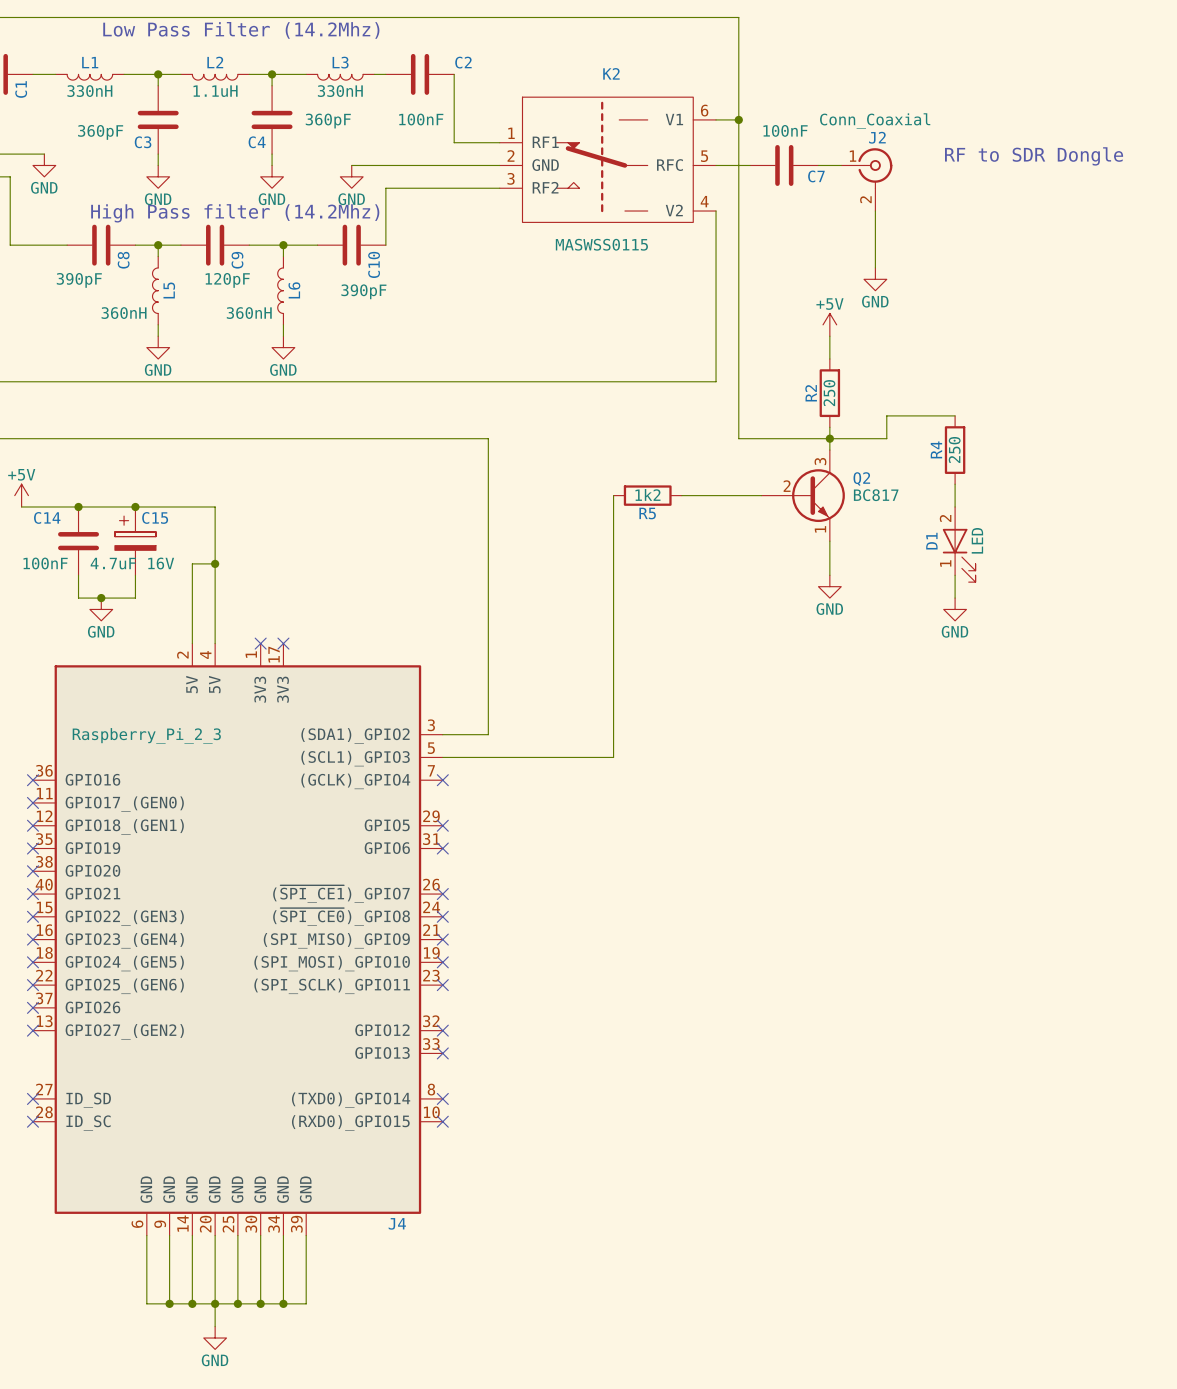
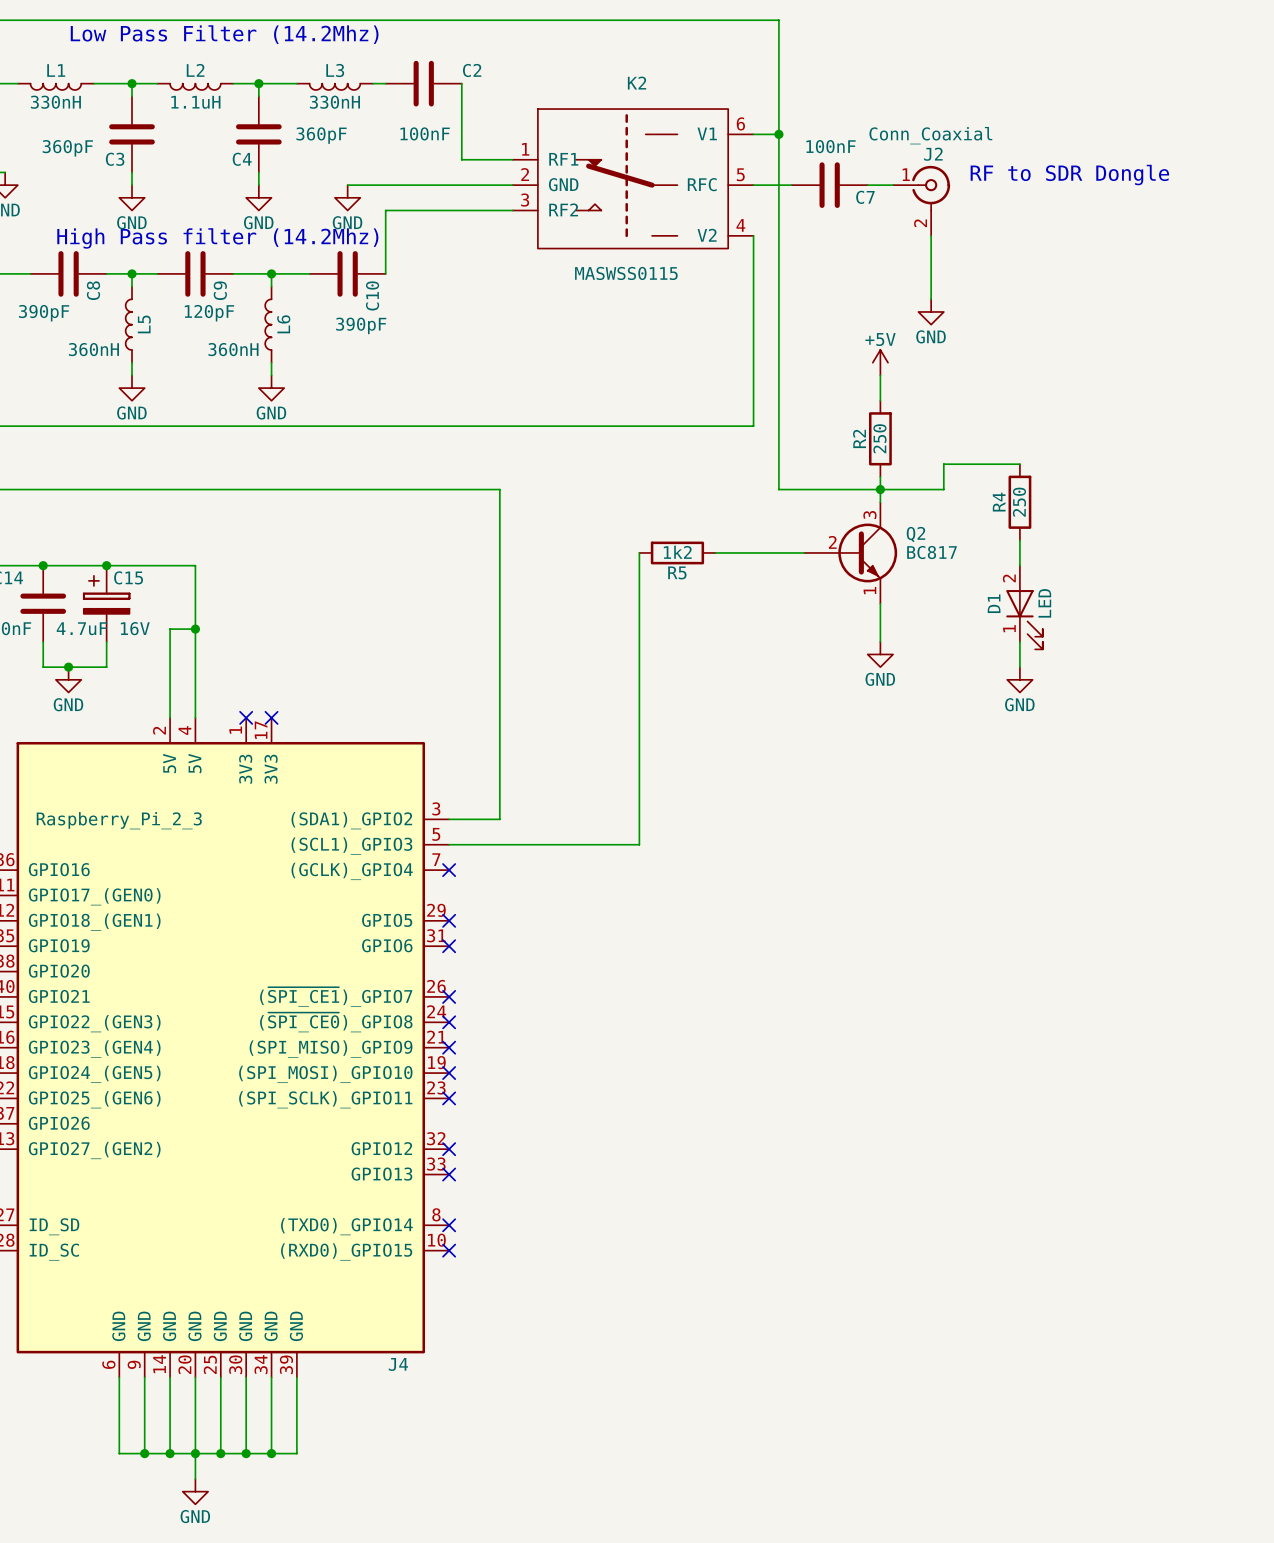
text position: RF to SDR Dongle (1034, 156) -> RF to SDR Dongle (1069, 175)

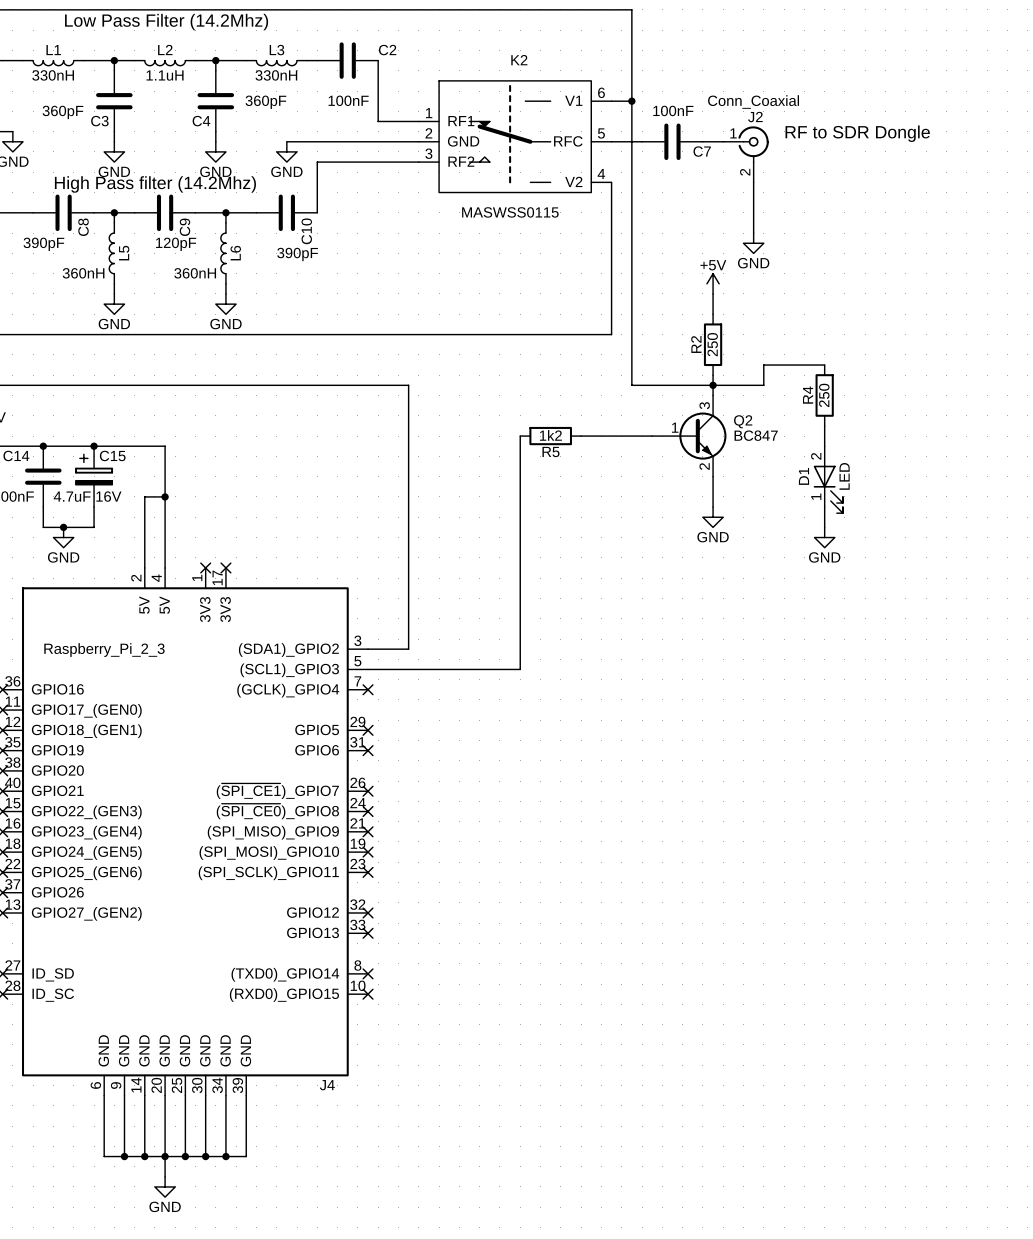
Q2 pin number: 2 (832, 542) -> 1 (675, 427)
Q2 value: BC817 (932, 552) -> BC847 (756, 435)
Q2 pin number: 1 (869, 590) -> 2 (704, 466)

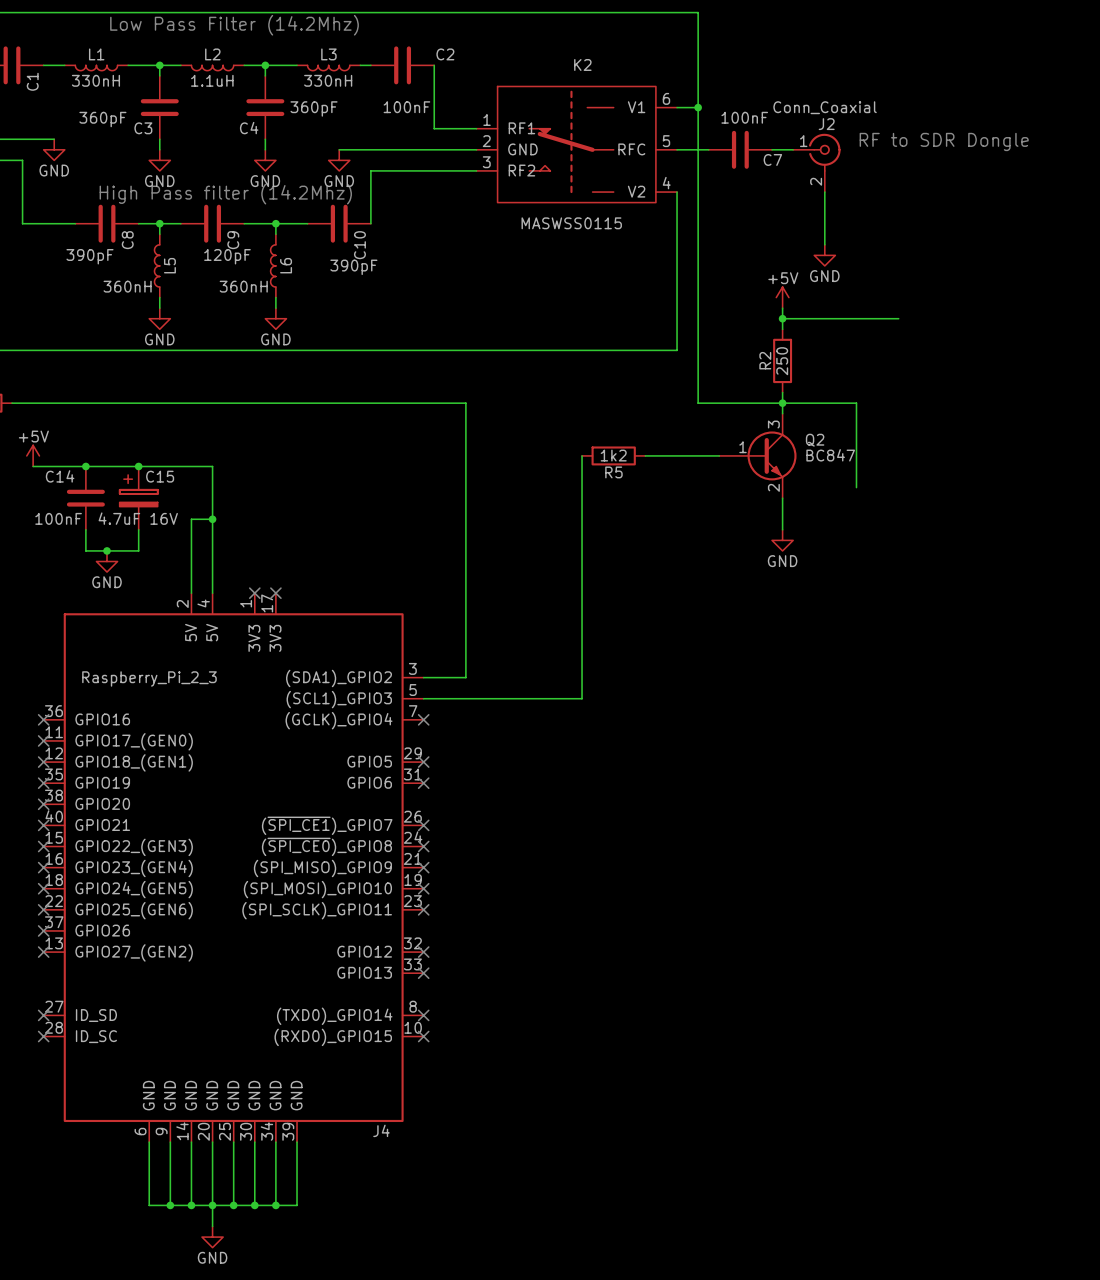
wire: none -> (782, 318) (898, 318)
junction: none -> (782, 318)
wire: (824, 365) (763, 365) (763, 385) -> (856, 487) (856, 403) (835, 403)
R4: 250 (824, 395) -> none
wire: (824, 425) (824, 446) -> none
D1: LED (828, 479) -> none
wire: (824, 507) (824, 527) -> none
power symbol: GND (824, 537) -> none

